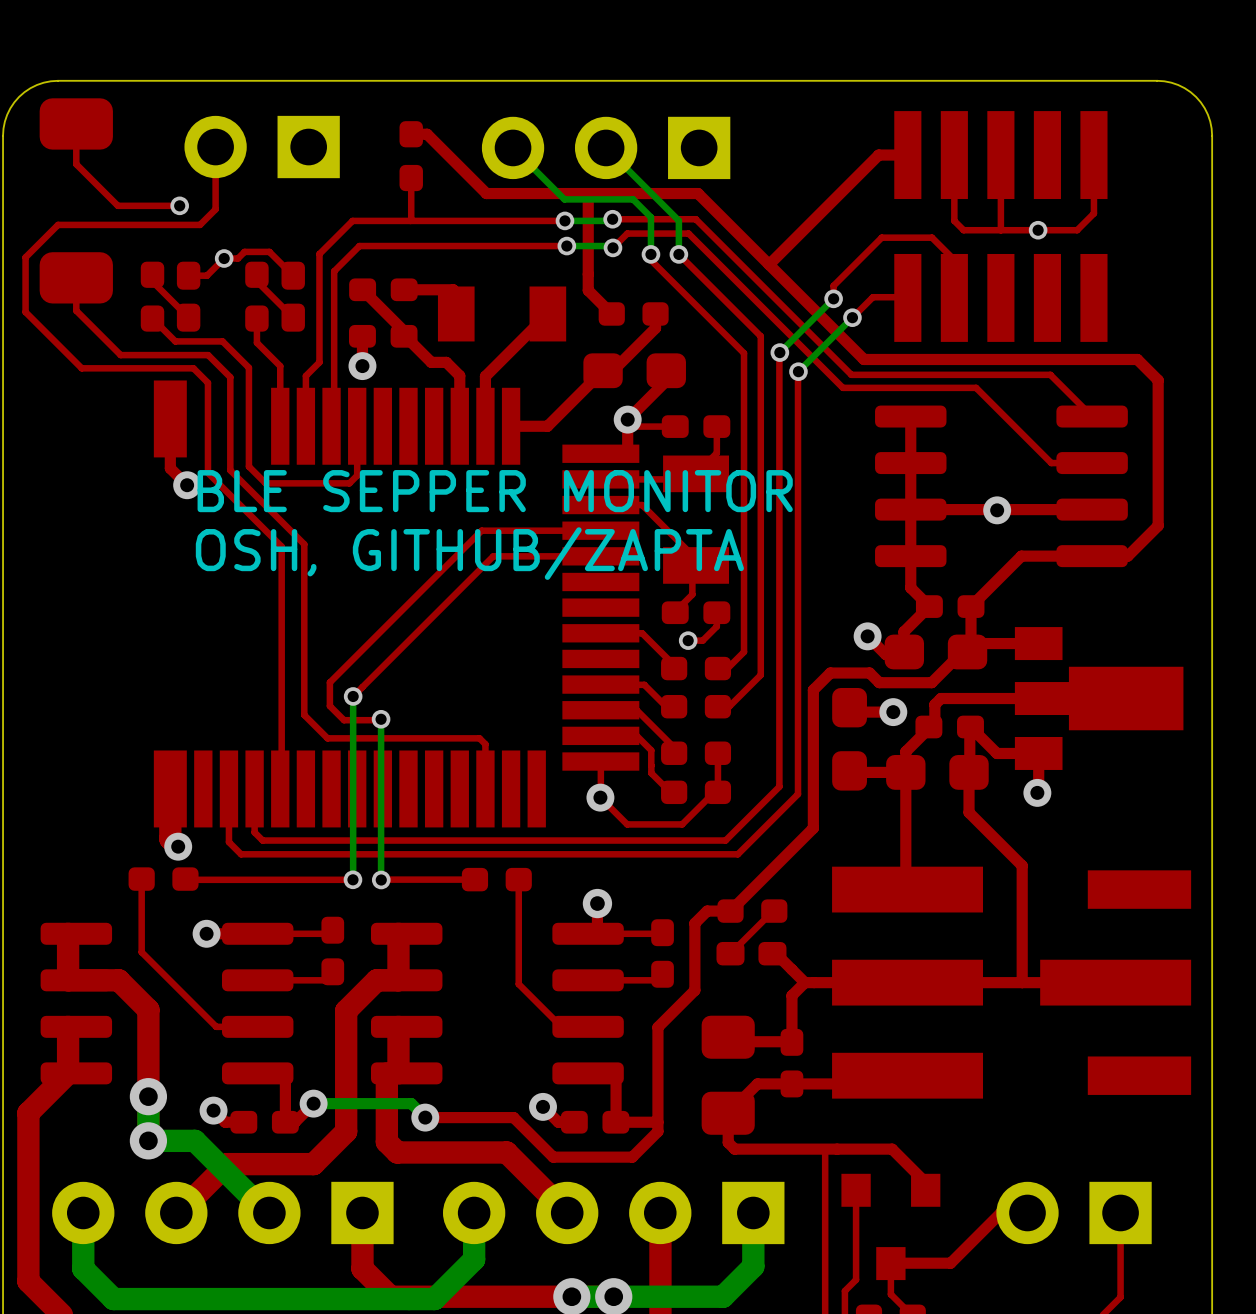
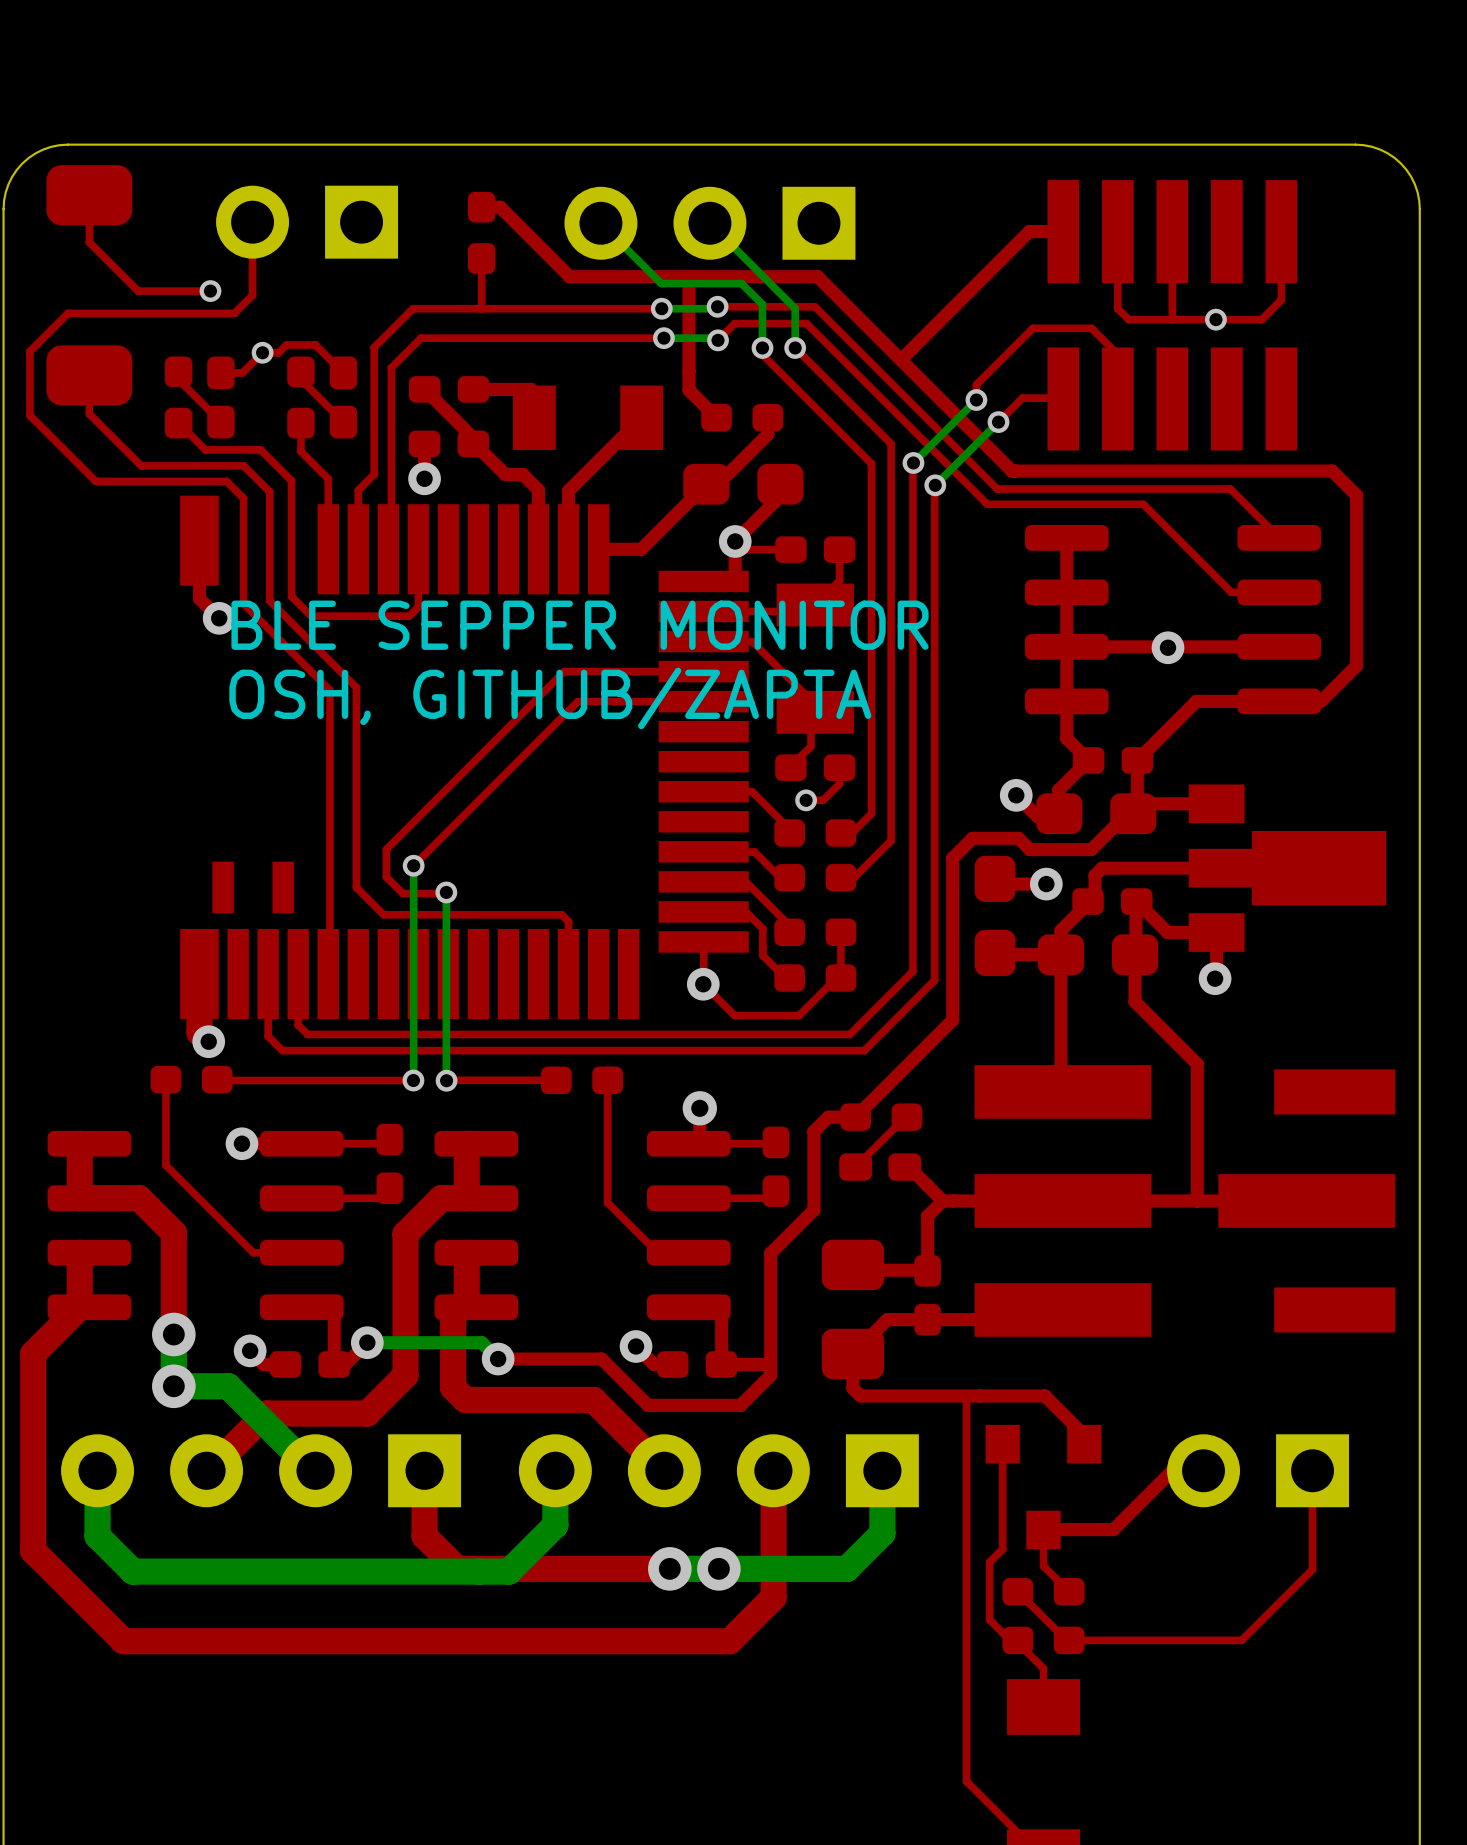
part footprint: [153, 380, 640, 828] -> [180, 495, 749, 1020]

